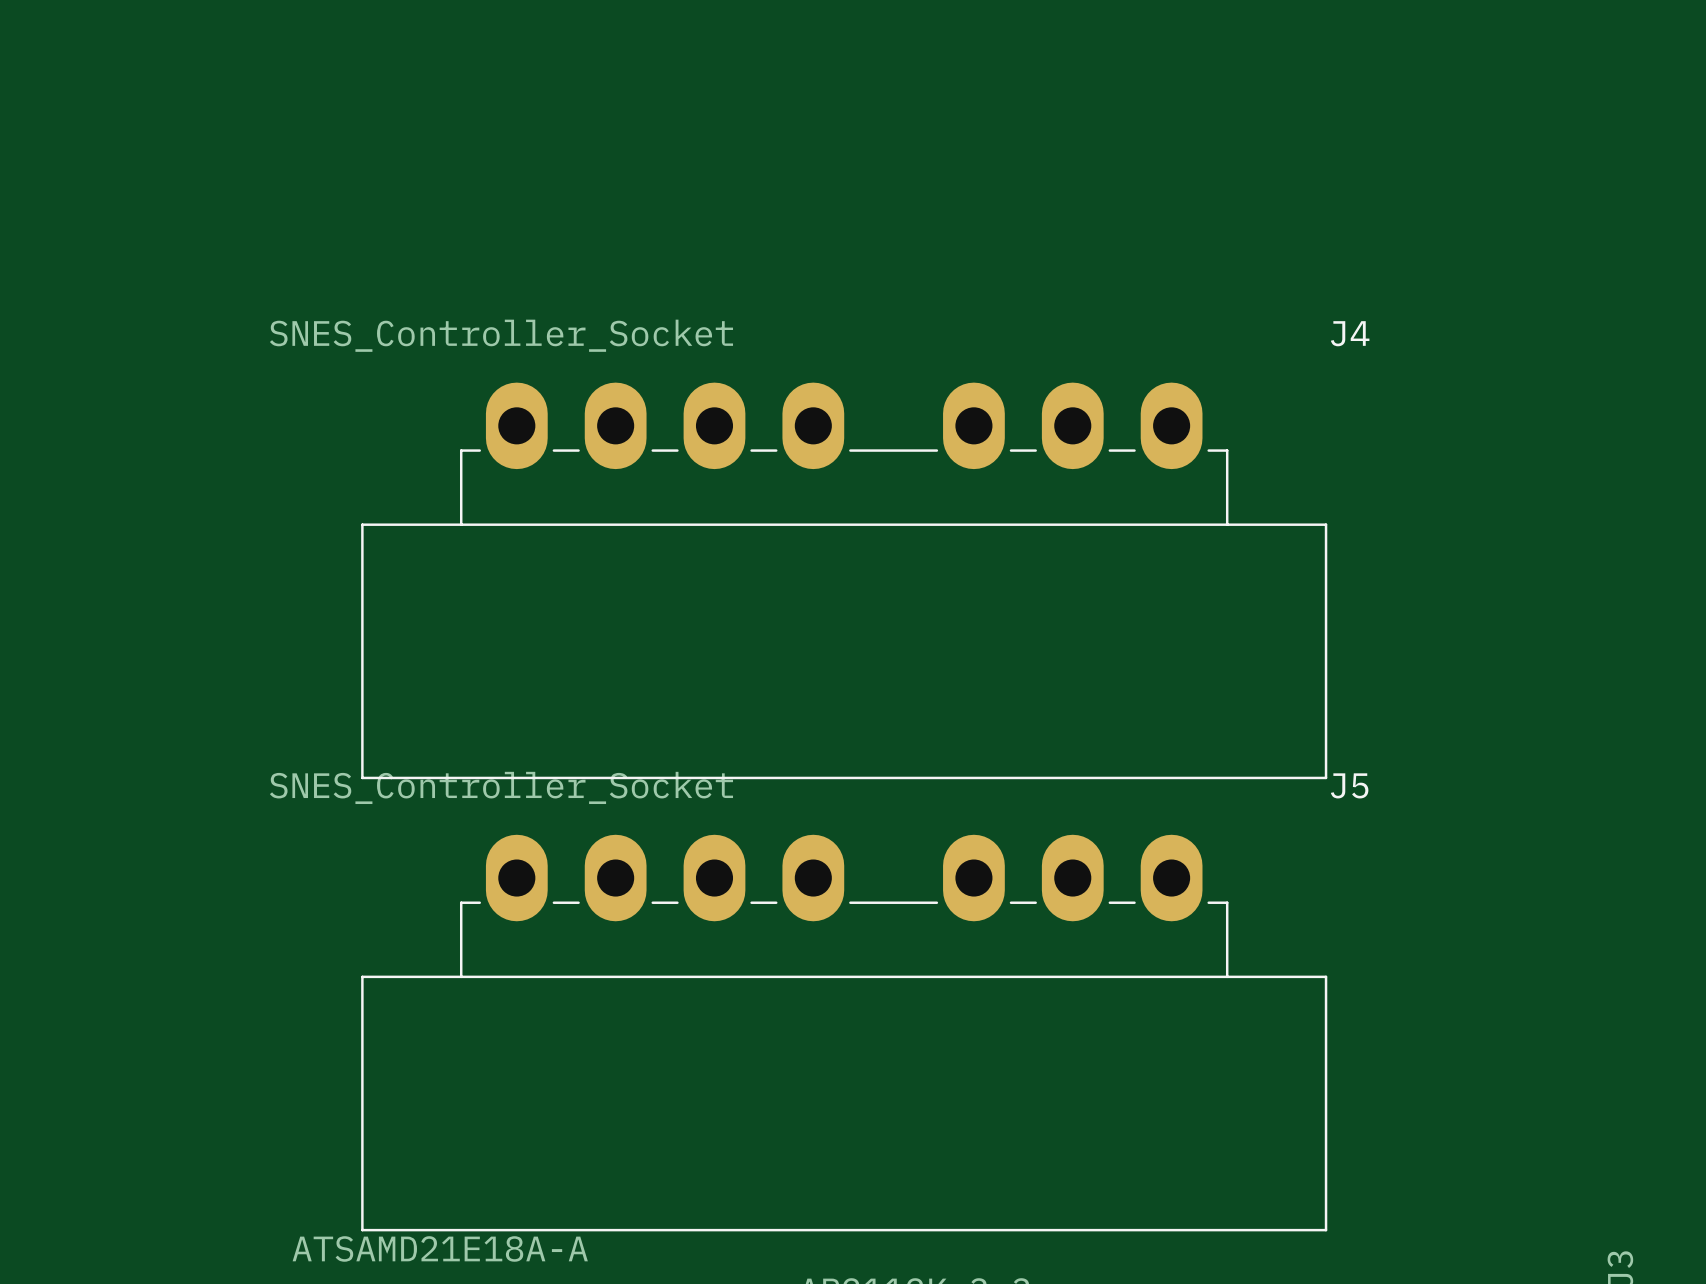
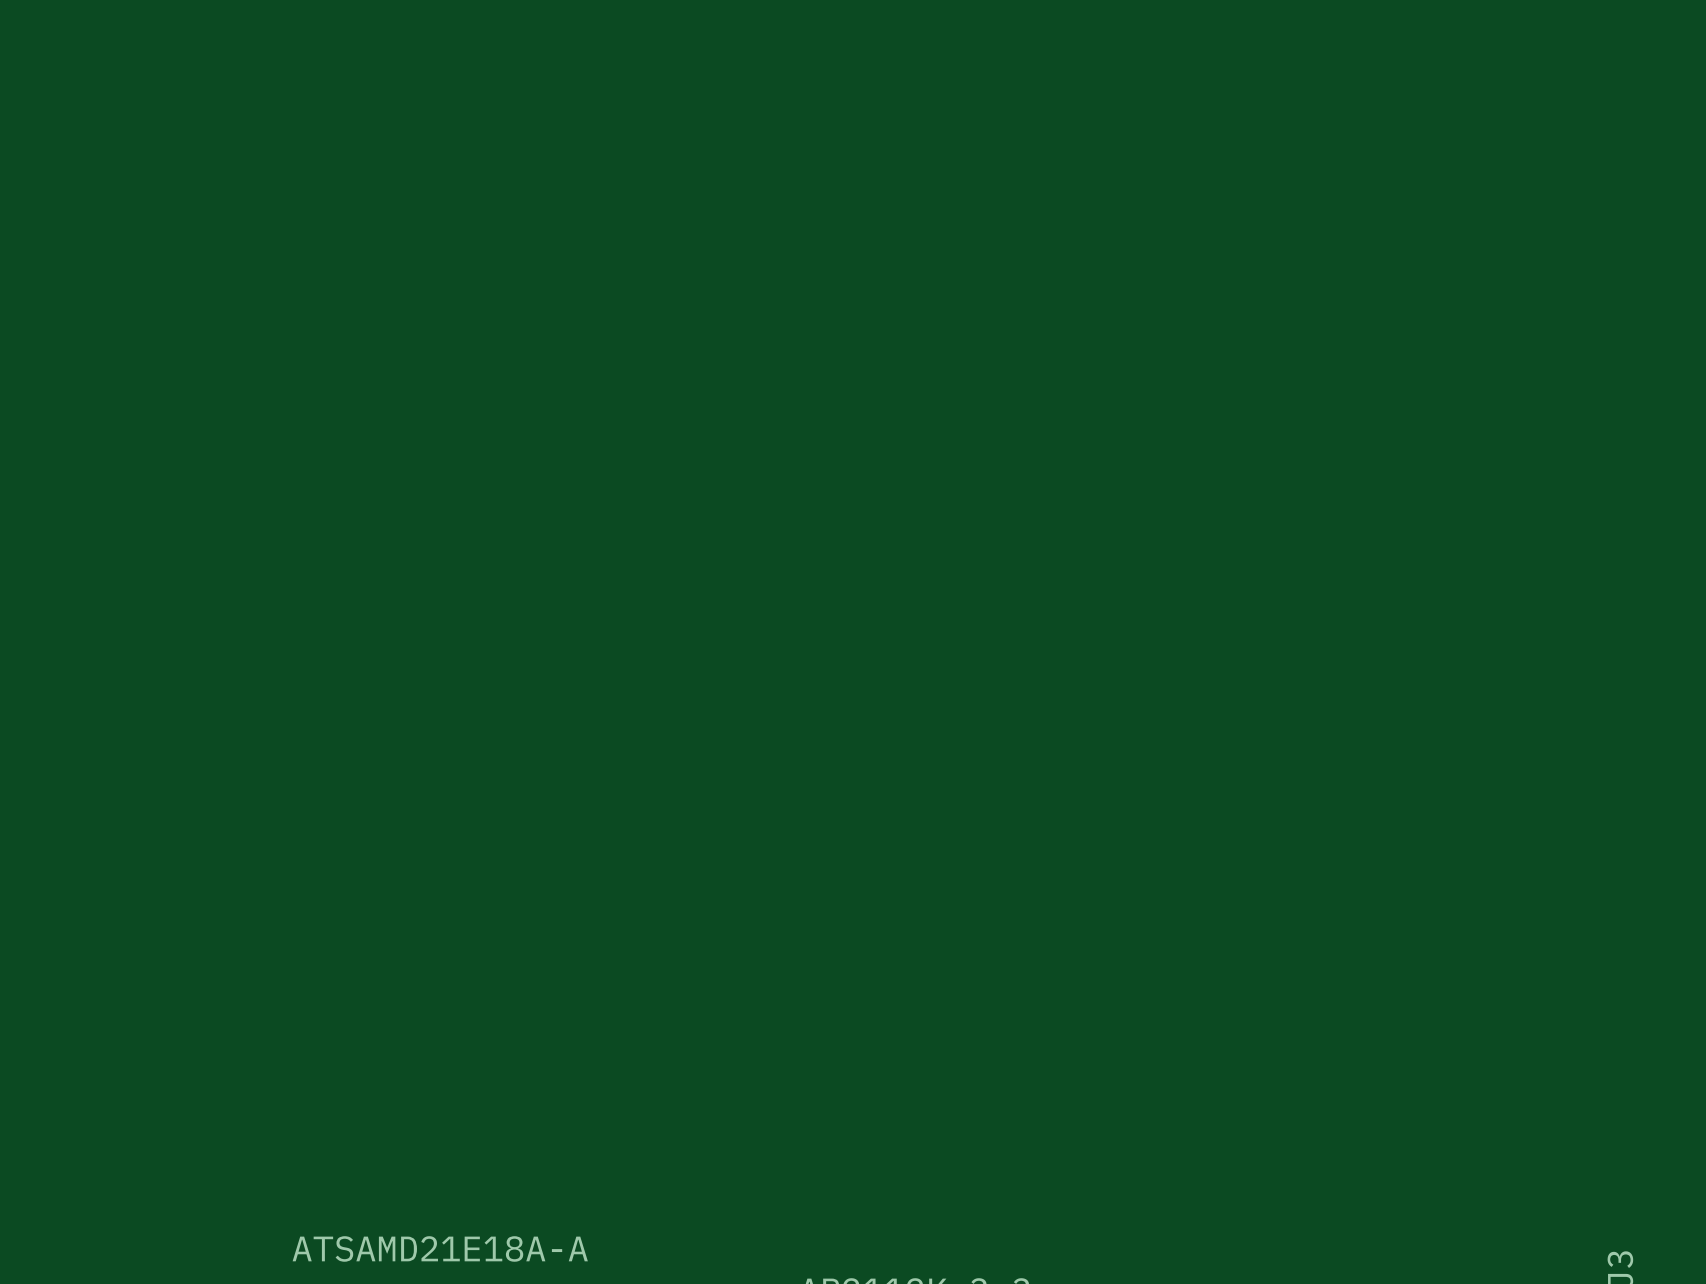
J4: SNES_Controller_Socket (844, 580) -> none
J5: SNES_Controller_Socket (844, 1033) -> none

